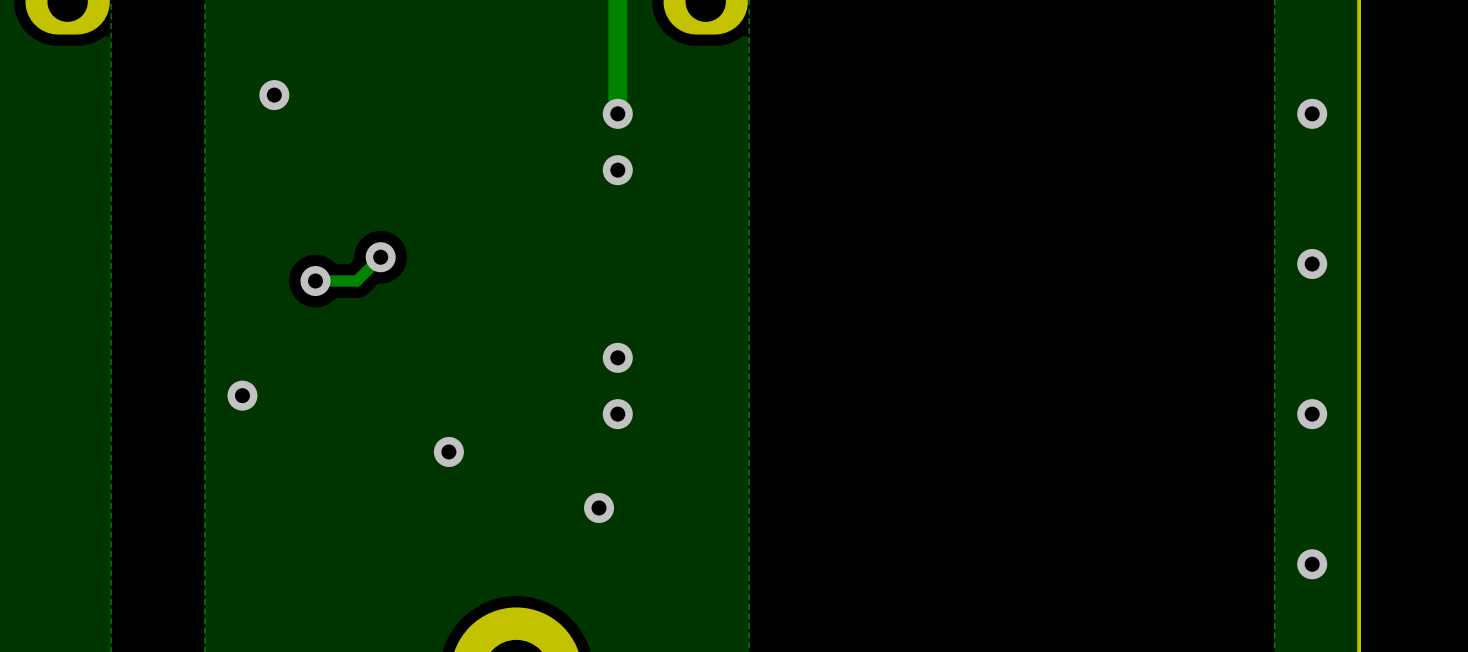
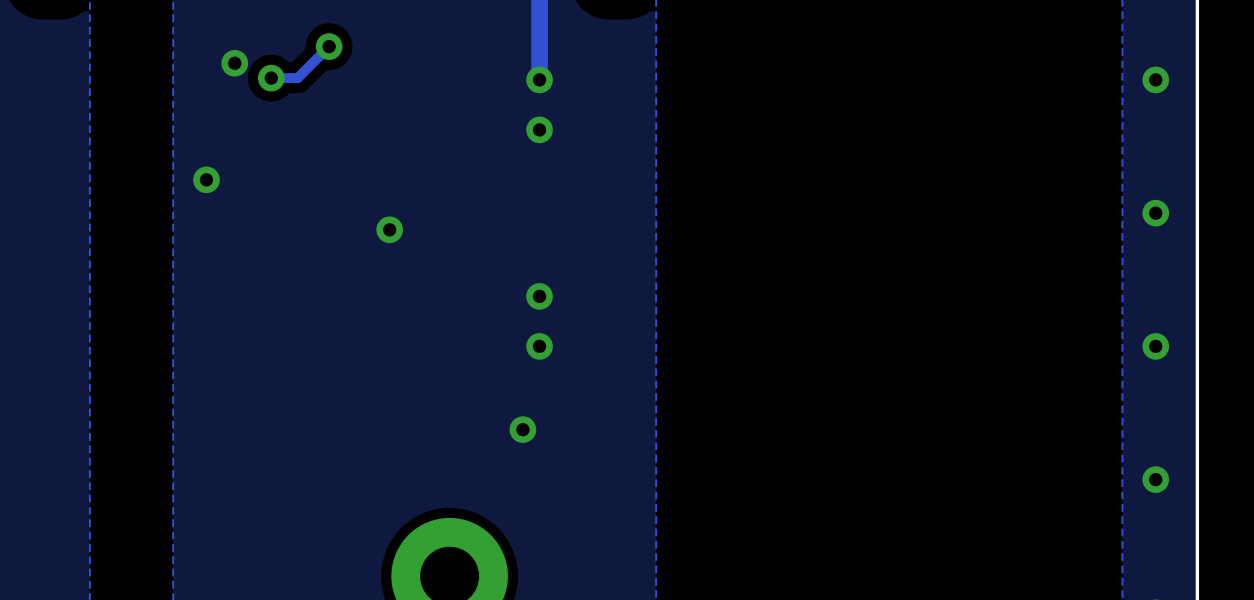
track: none -> (329, 46) (297, 78) (271, 78)
via: none -> (329, 46)
via: none -> (271, 78)
via: none -> (206, 179)
track: (380, 257) (356, 281) (315, 281) -> none
via: (380, 257) -> none
via: (315, 281) -> none
via: none -> (389, 229)
via: (242, 395) -> none
via: (448, 451) -> none

